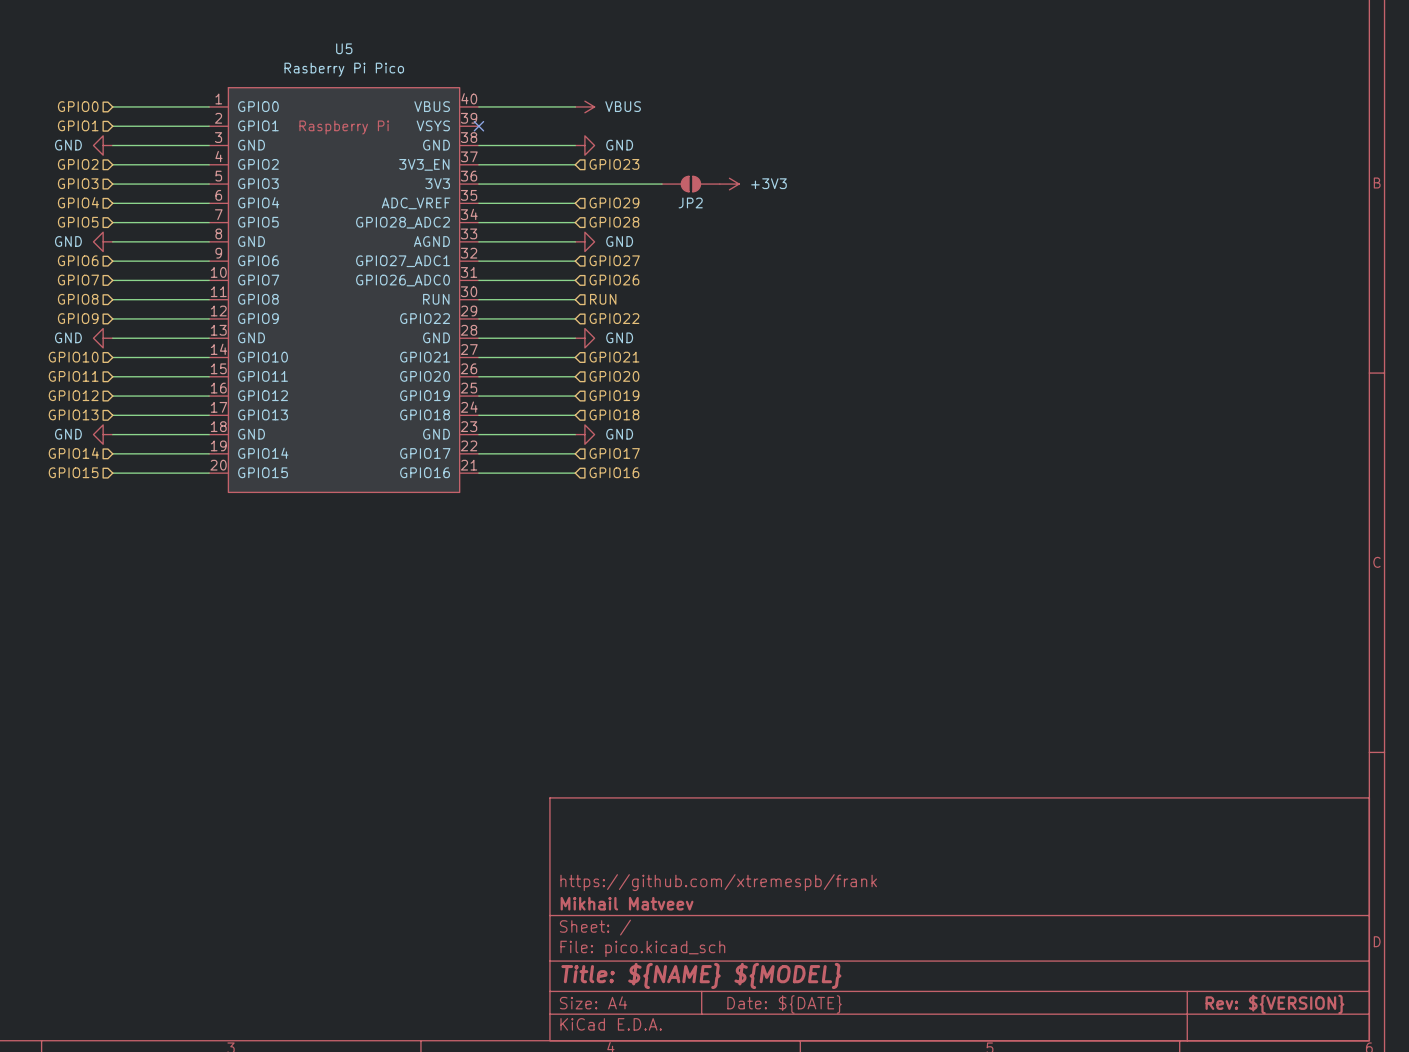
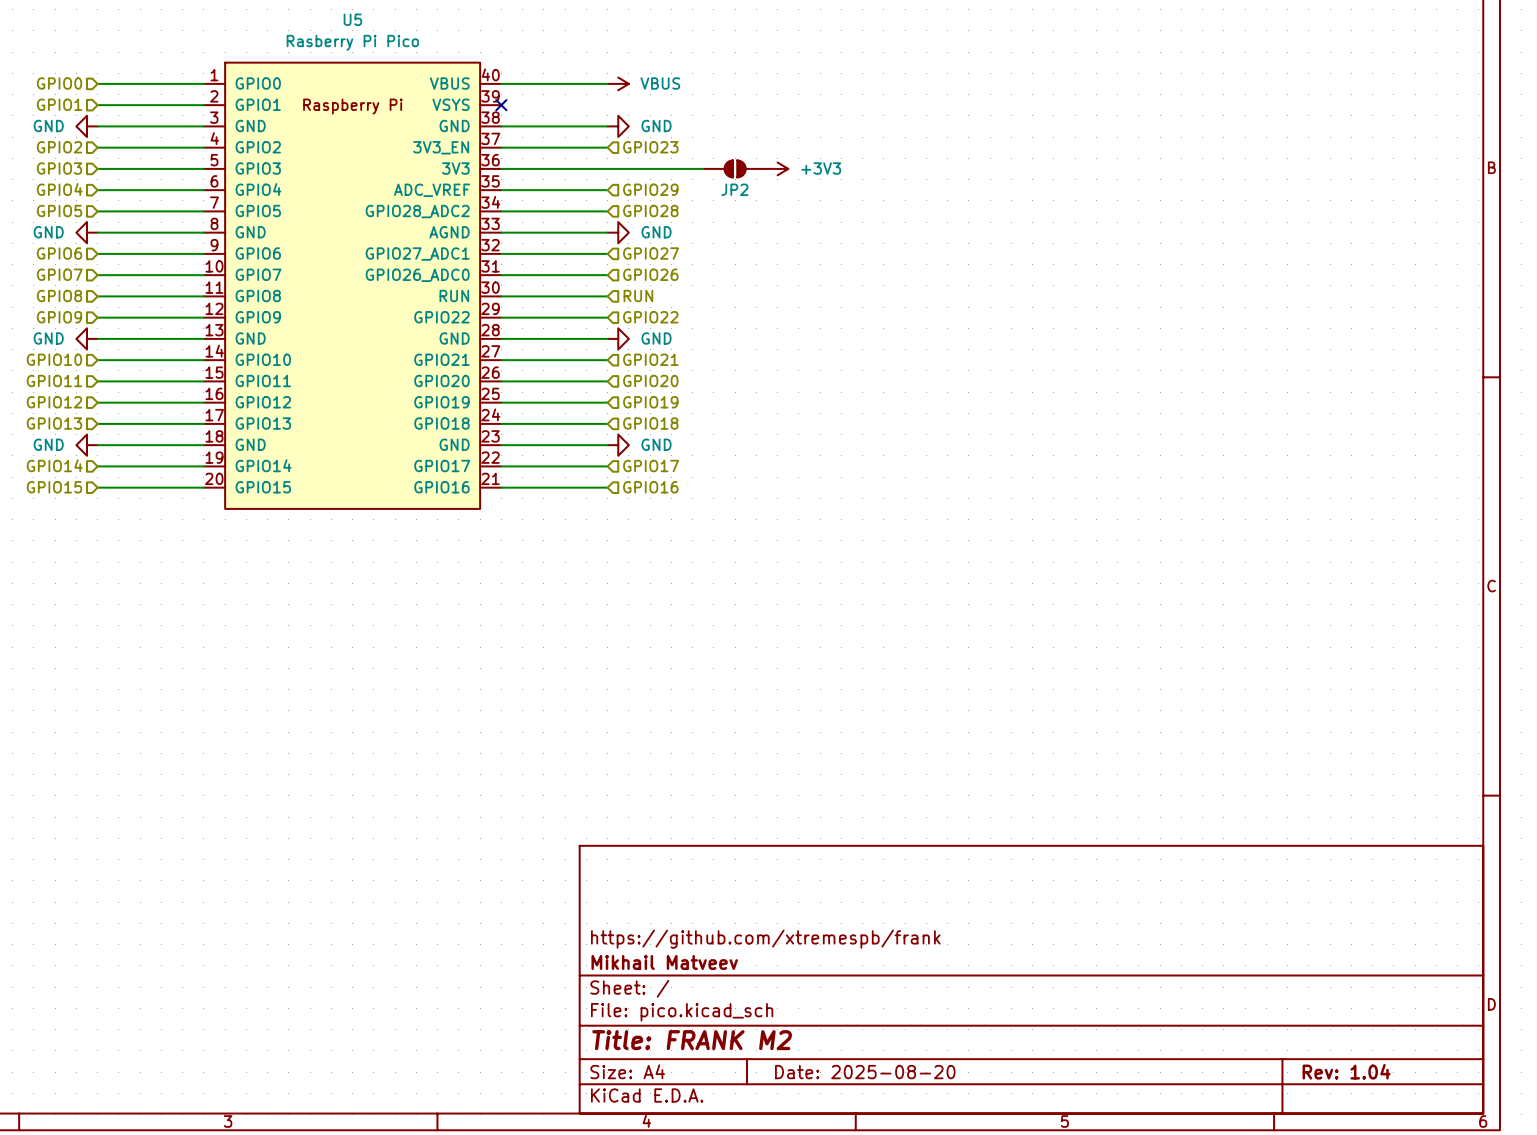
title block: Title: ${NAME} ${MODEL} (701, 975) -> Title: FRANK M2 (692, 1040)
title block: Date: ${DATE} (784, 1004) -> Date: 2025-08-20 (865, 1072)
title block: Rev: ${VERSION} (1274, 1004) -> Rev: 1.04 (1346, 1071)

